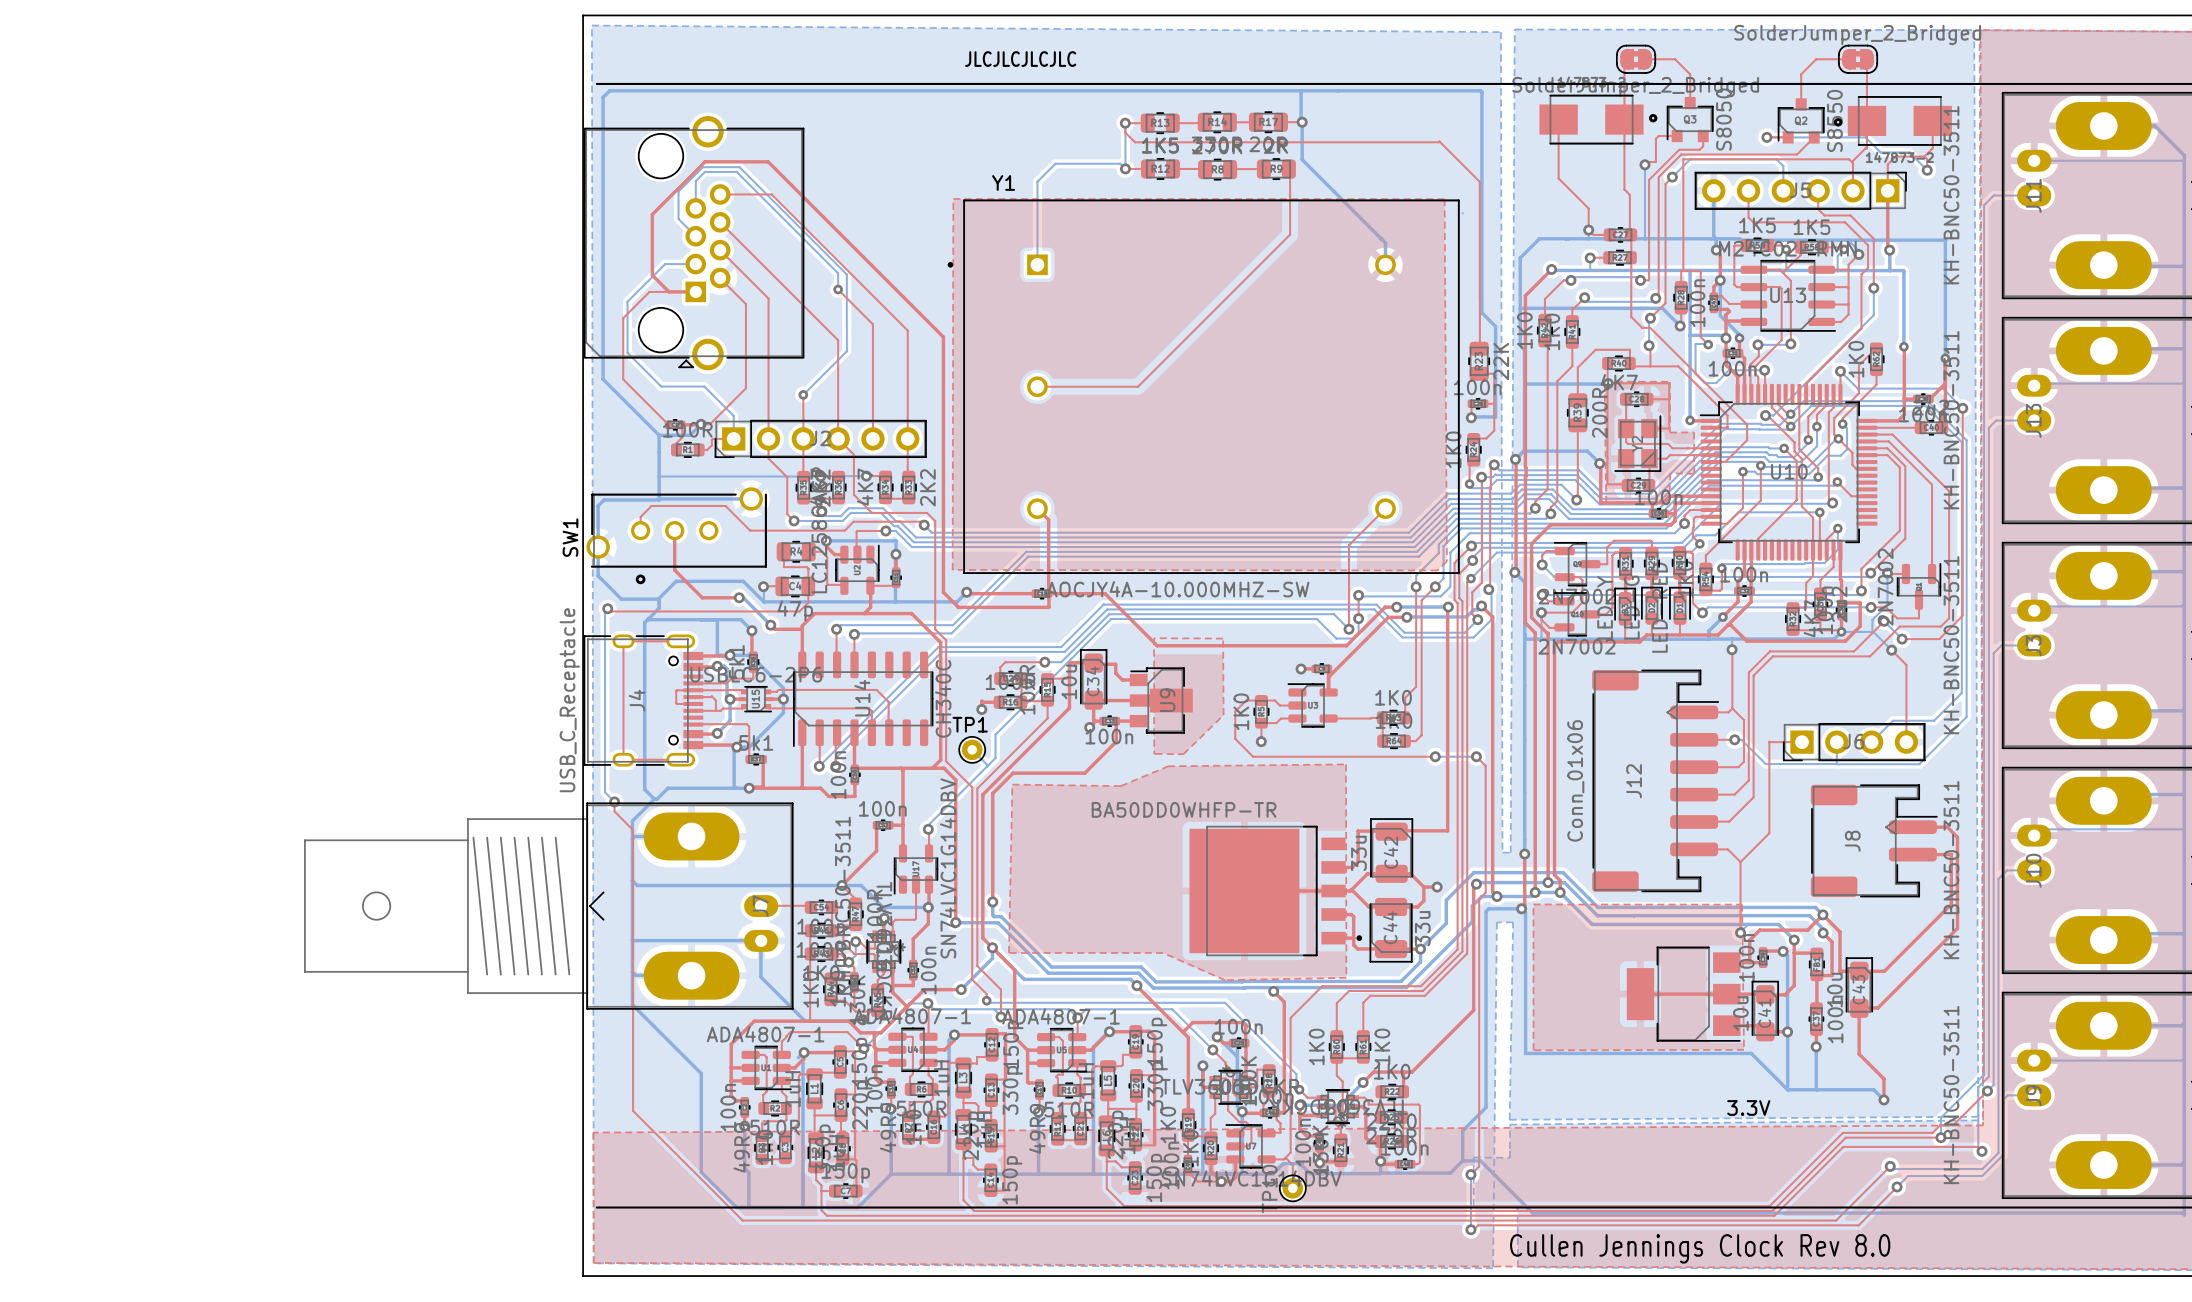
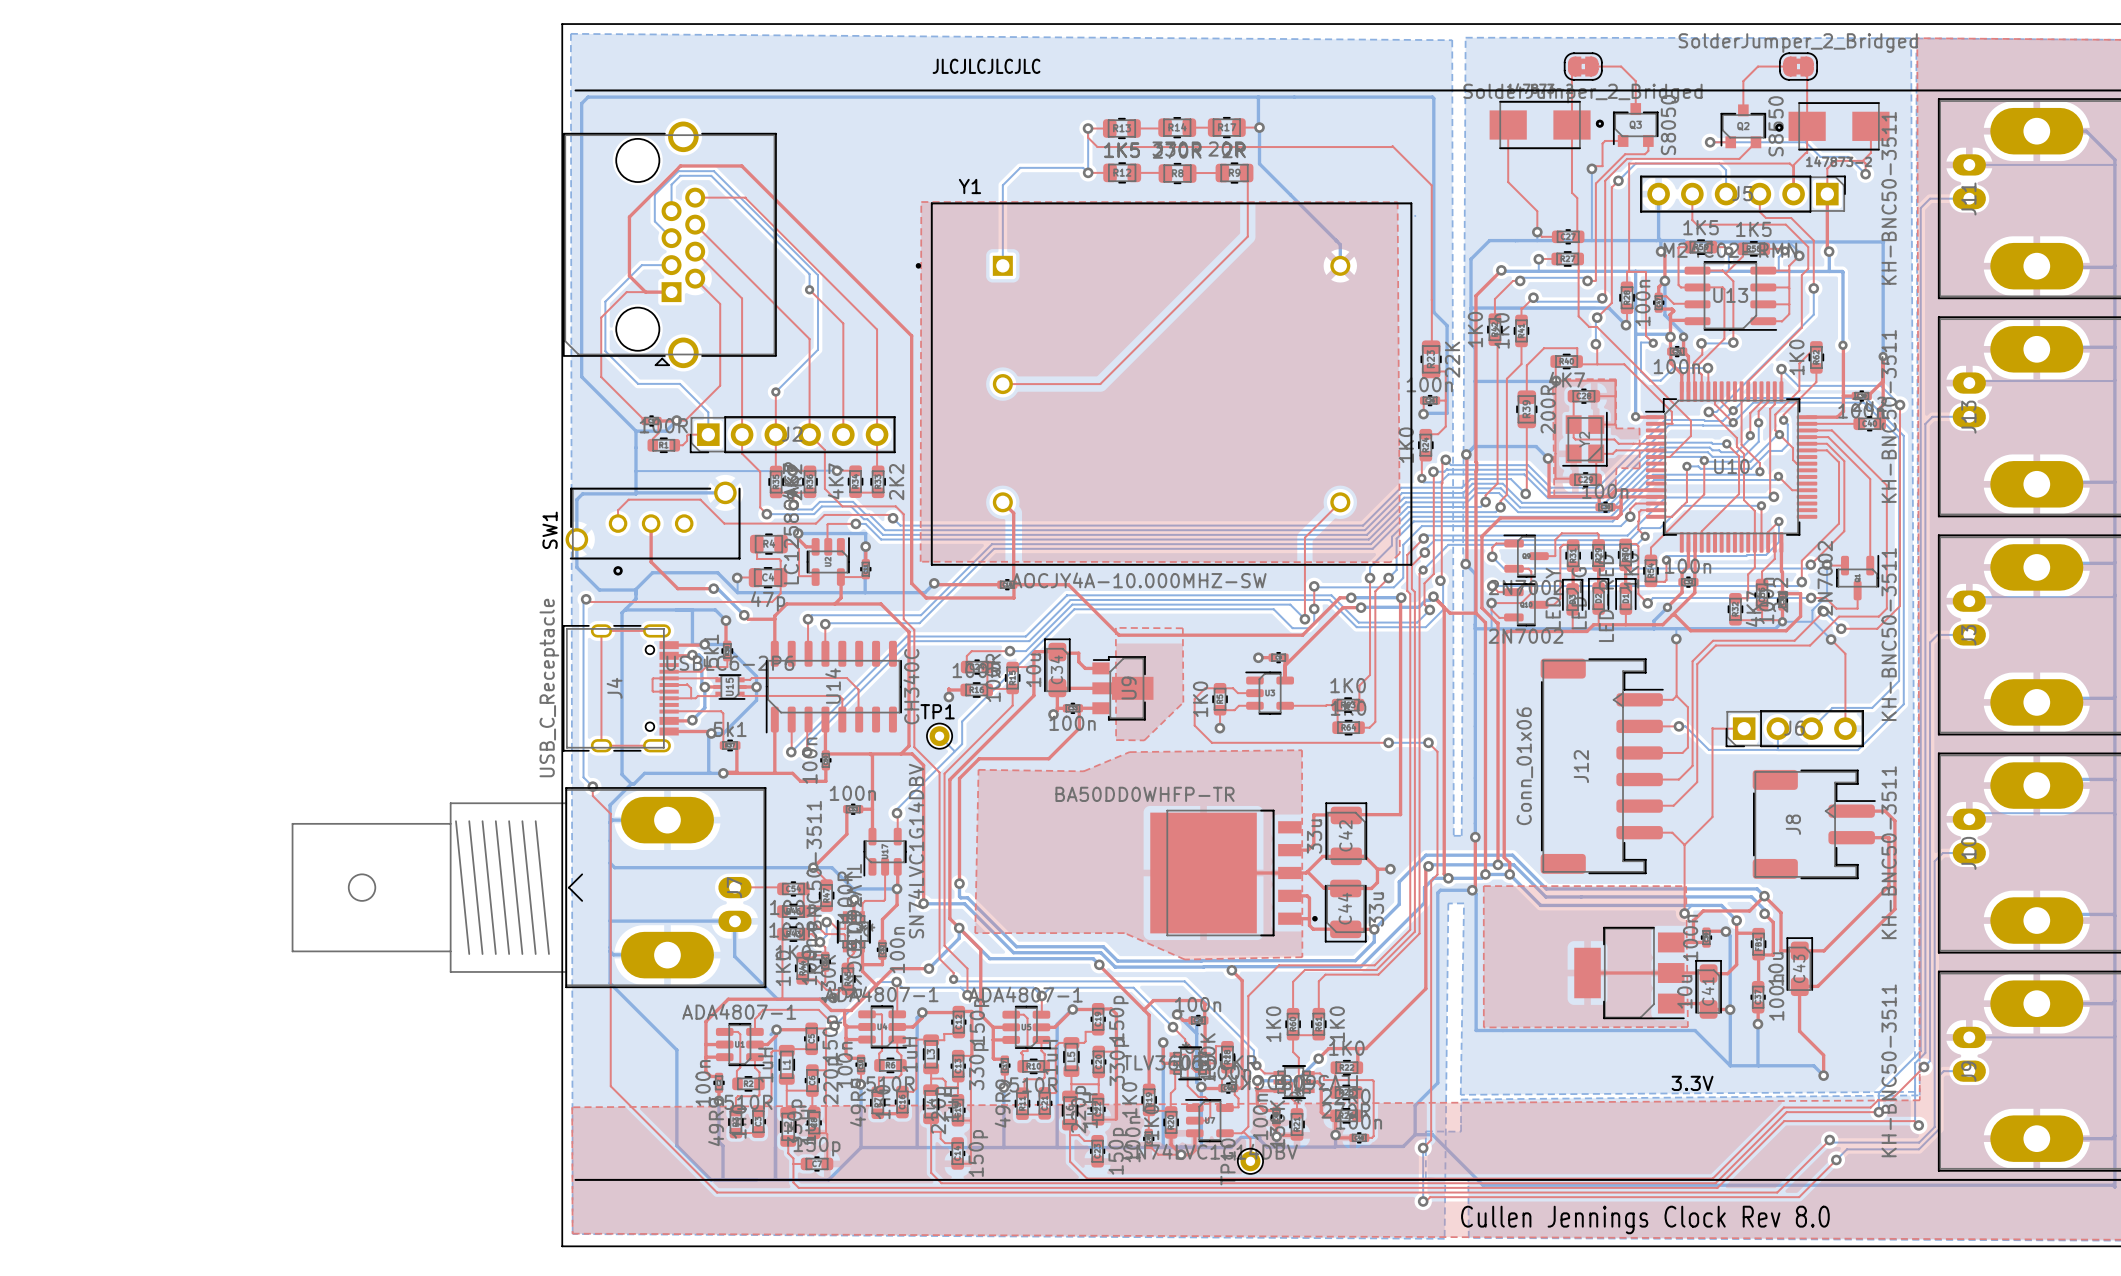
top track: none -> (1444, 607) (1449, 613) (1475, 613)

